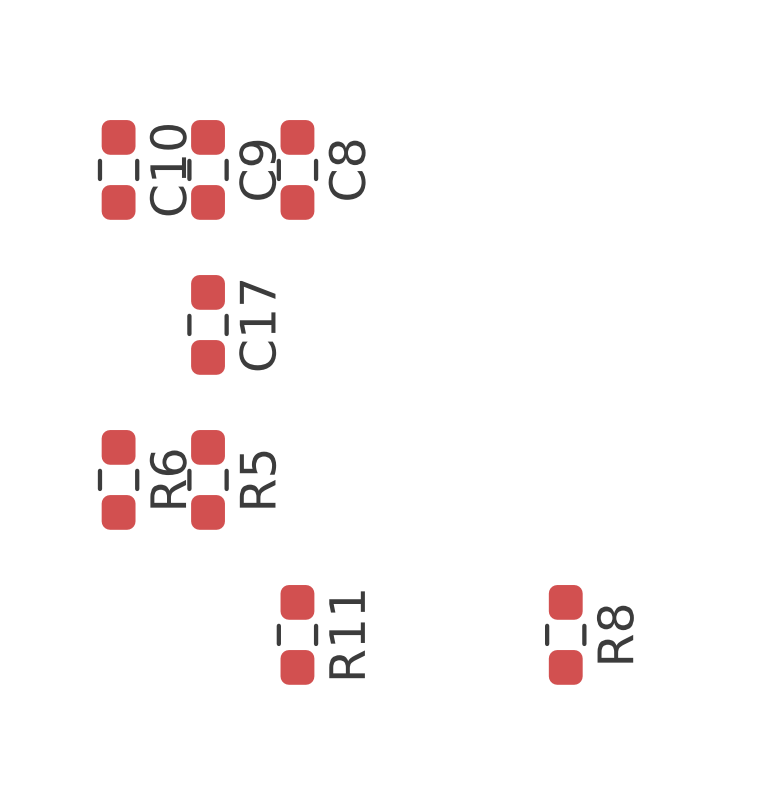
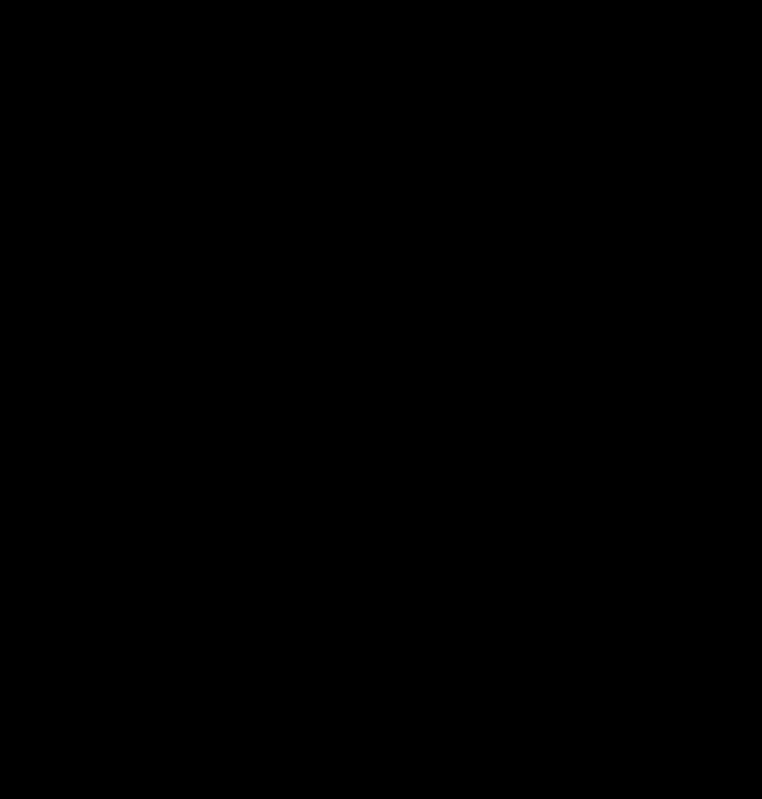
C10: (118, 169) -> none
C9: (208, 169) -> none
C8: (297, 169) -> none
C17: (208, 324) -> none
R6: (118, 479) -> none
R5: (208, 479) -> none
R11: (297, 634) -> none
R8: (565, 634) -> none

